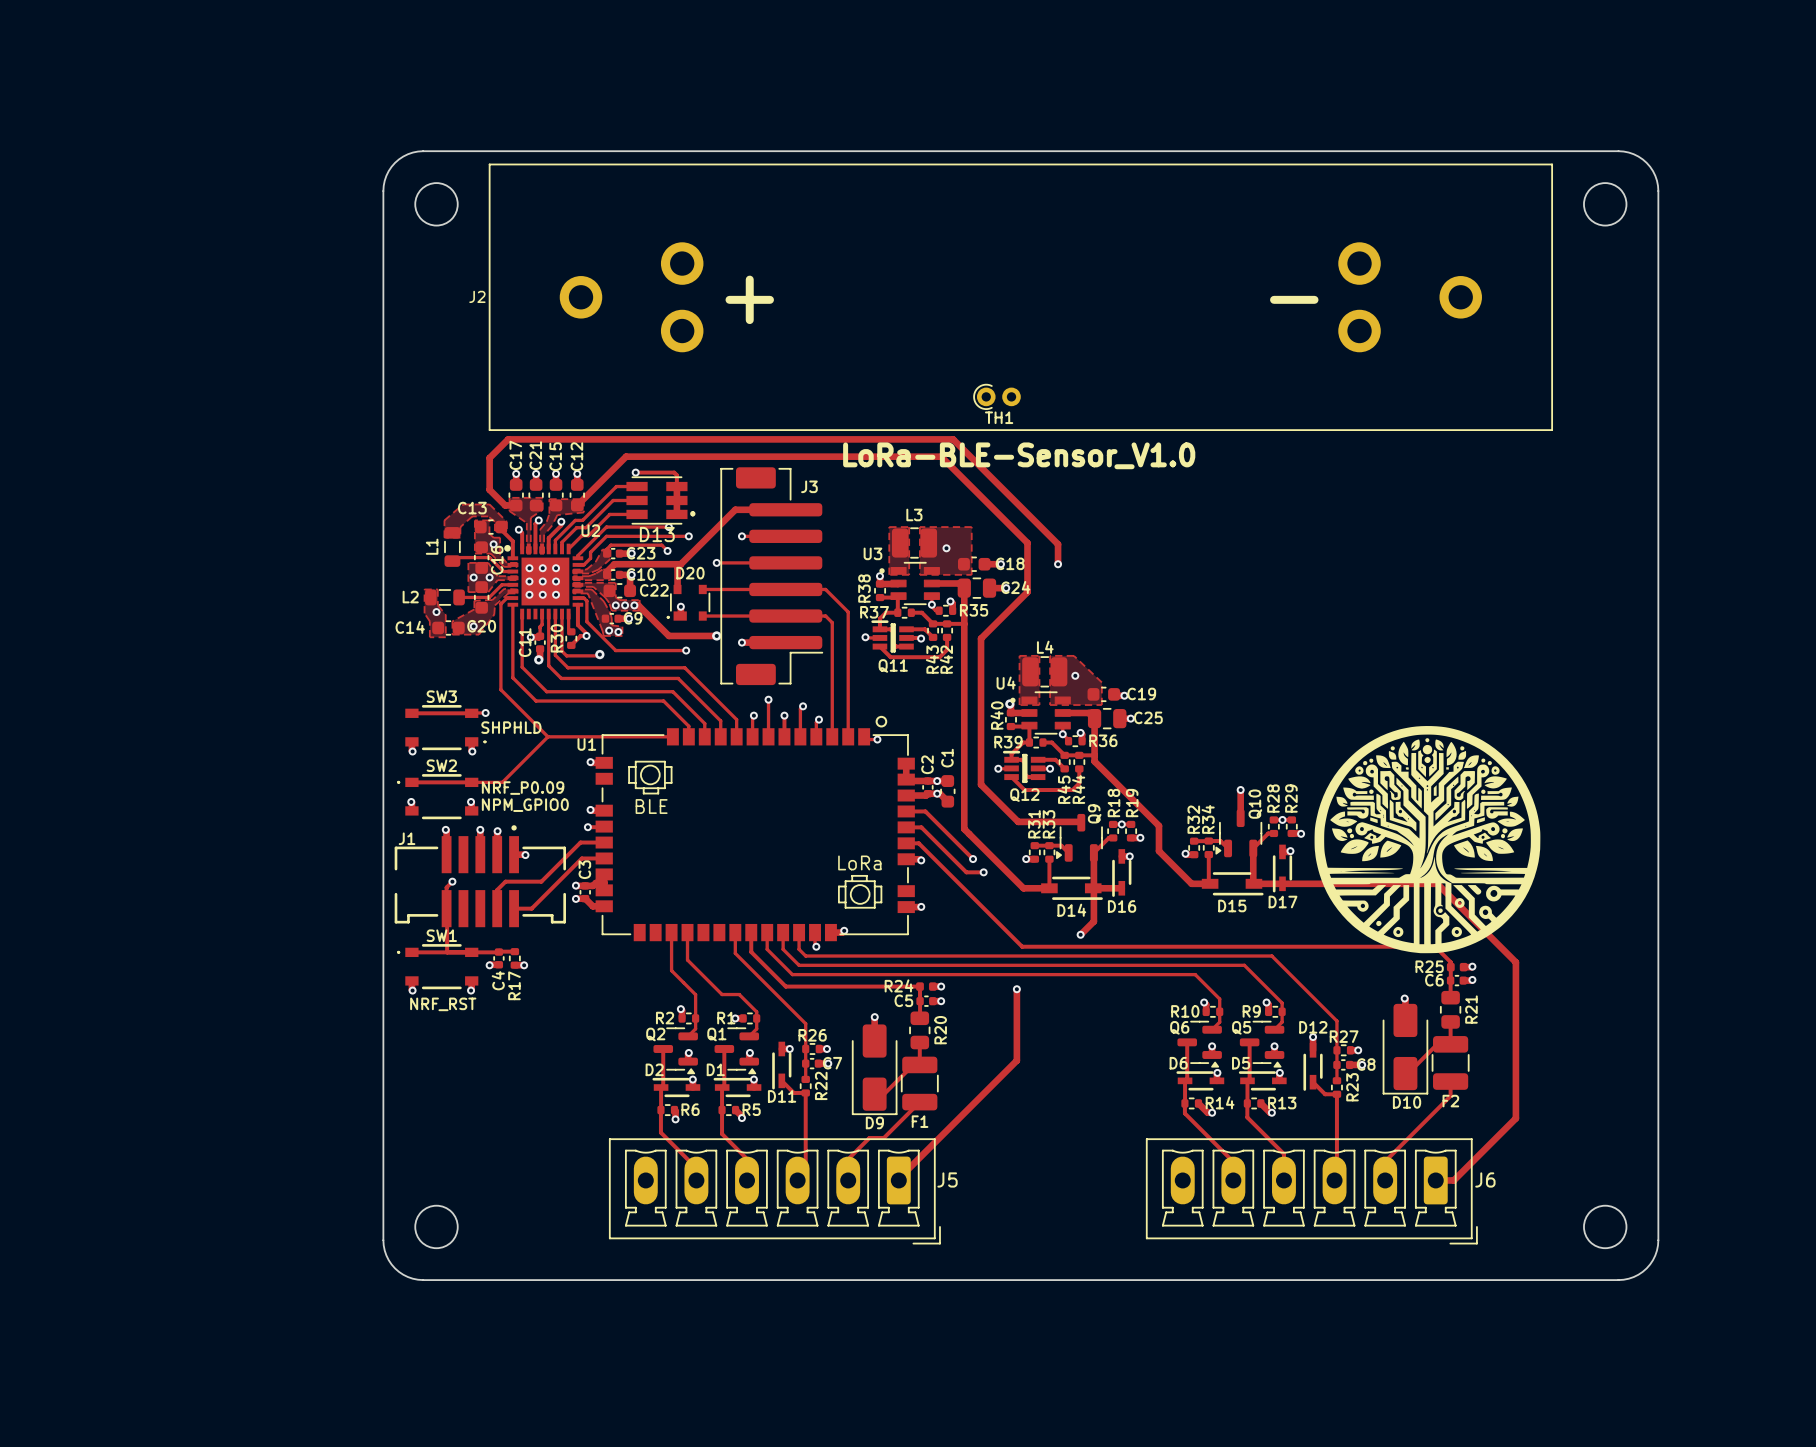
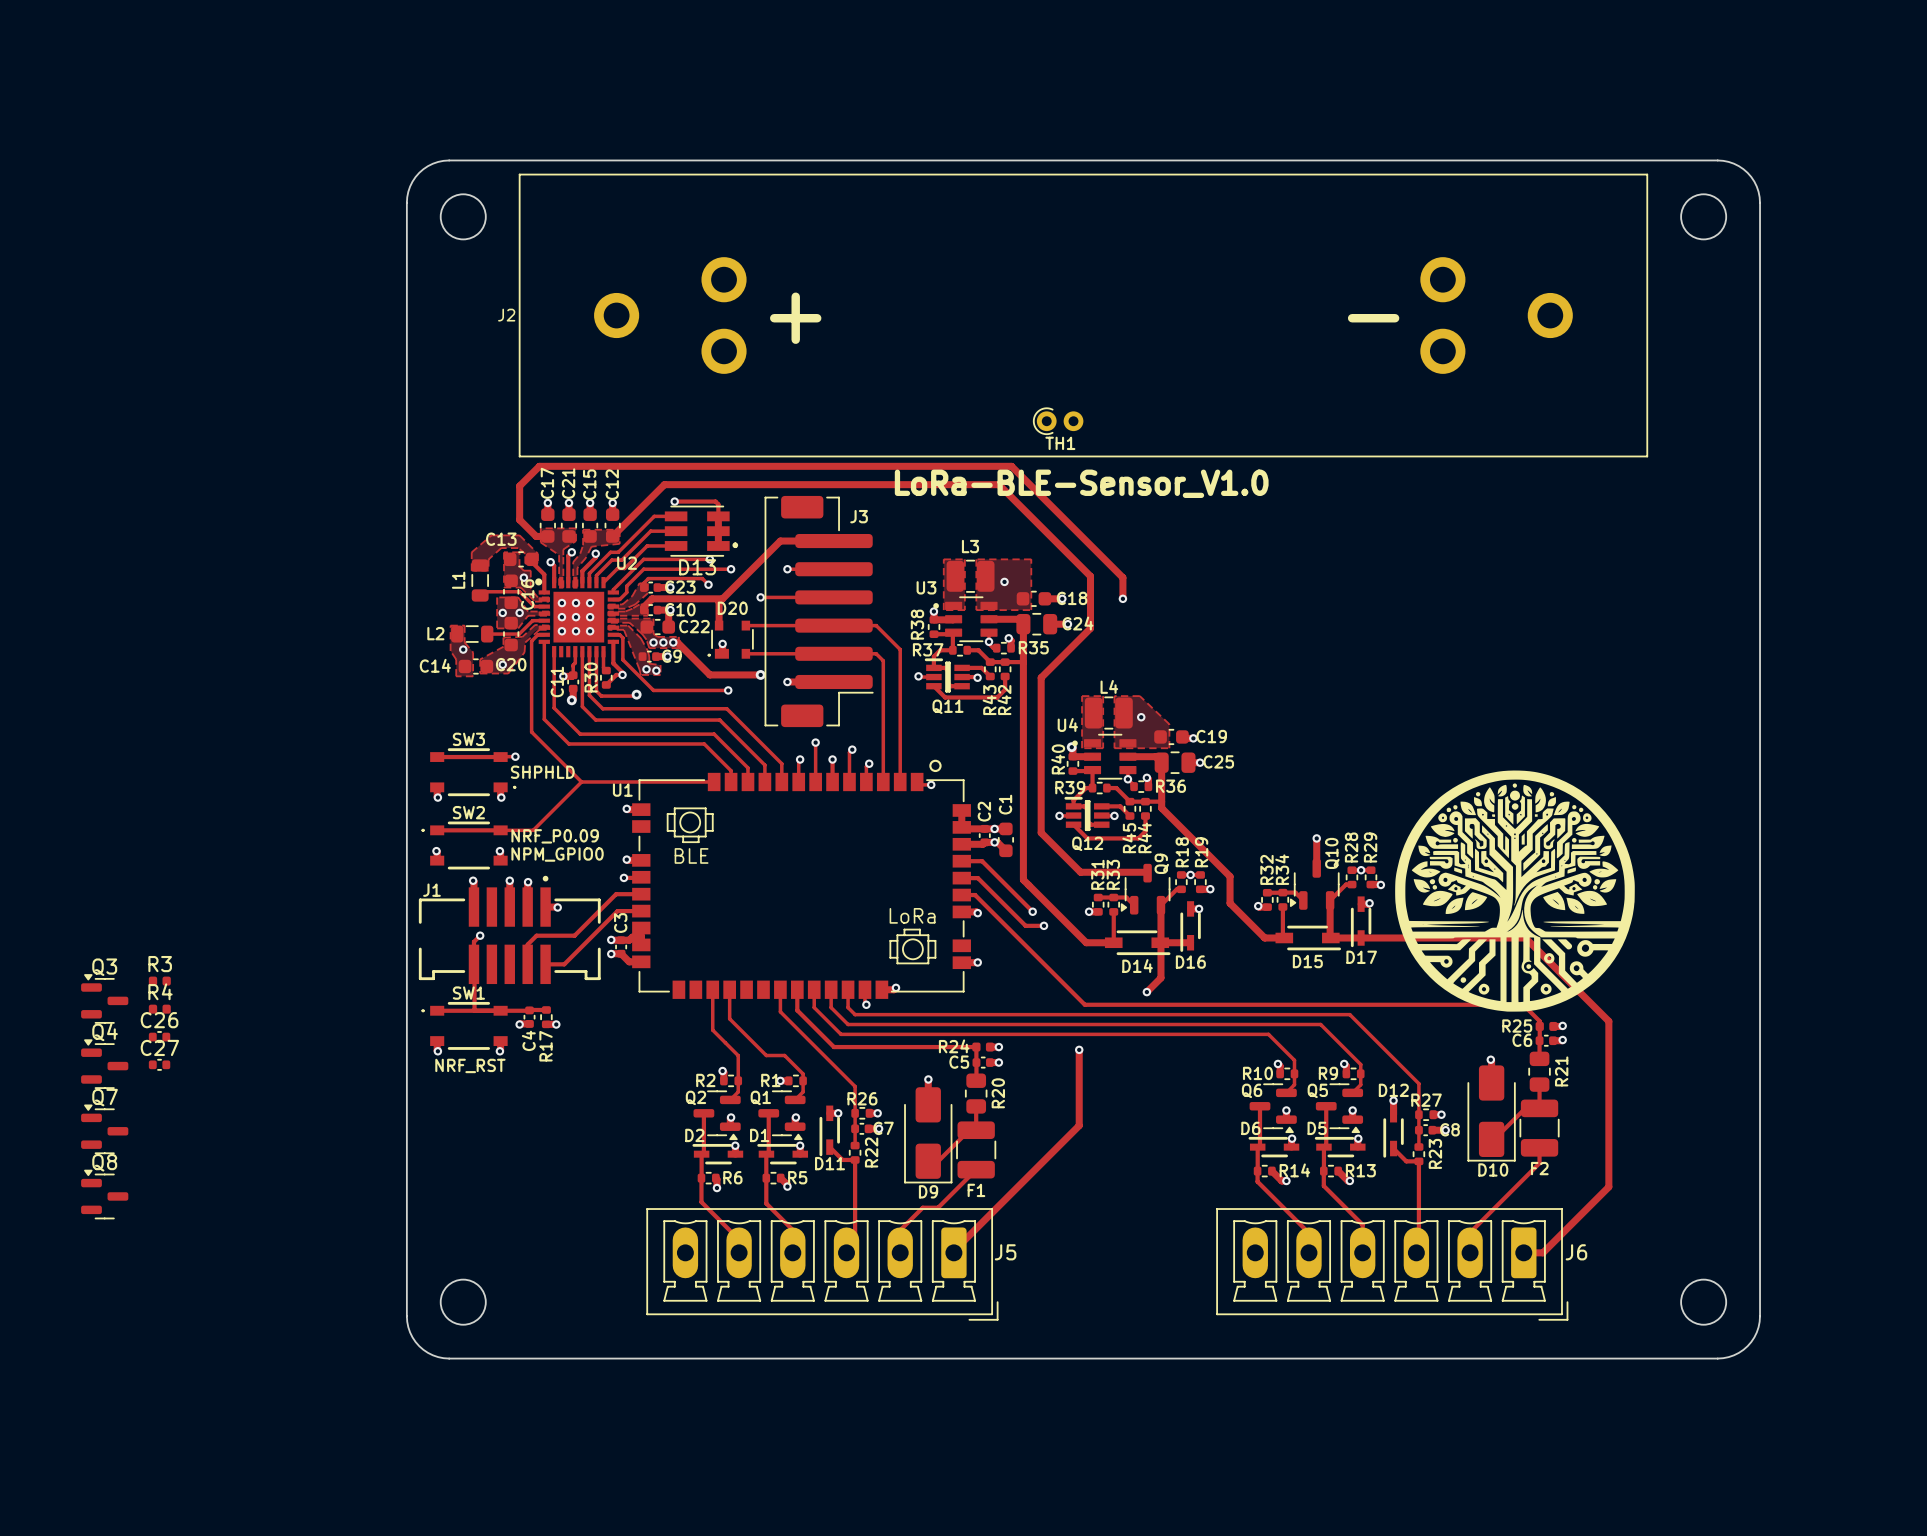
R3: none -> (159, 981)
Q3: none -> (104, 998)
R4: none -> (159, 1009)
C26: none -> (159, 1037)
Q4: none -> (104, 1064)
C27: none -> (159, 1064)
Q7: none -> (104, 1129)
Q8: none -> (104, 1194)

